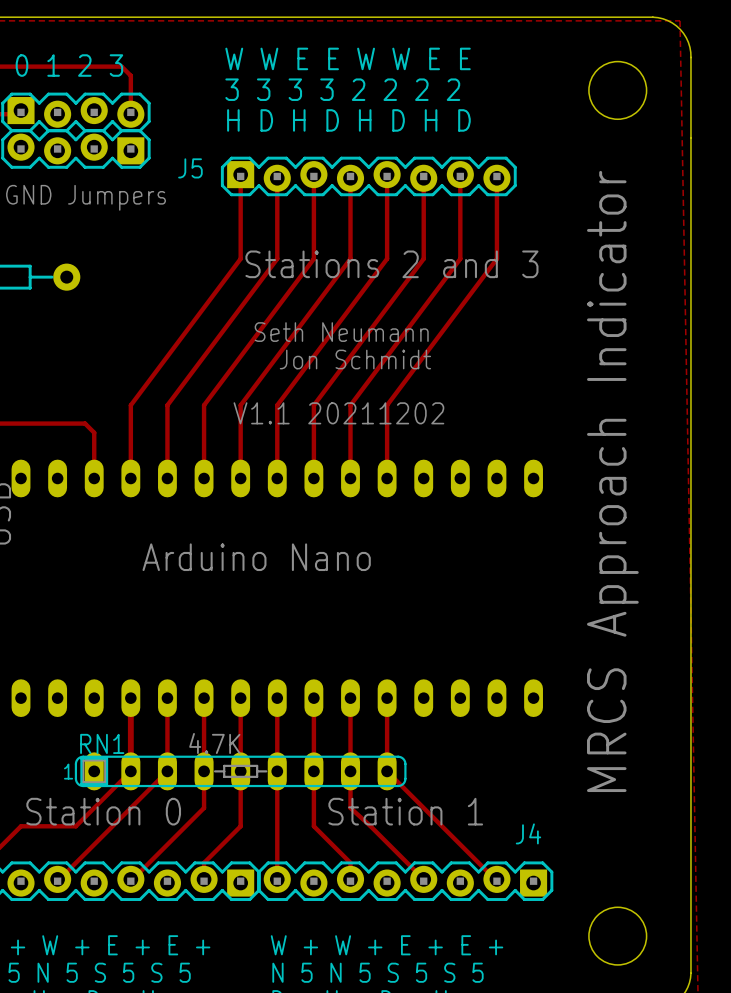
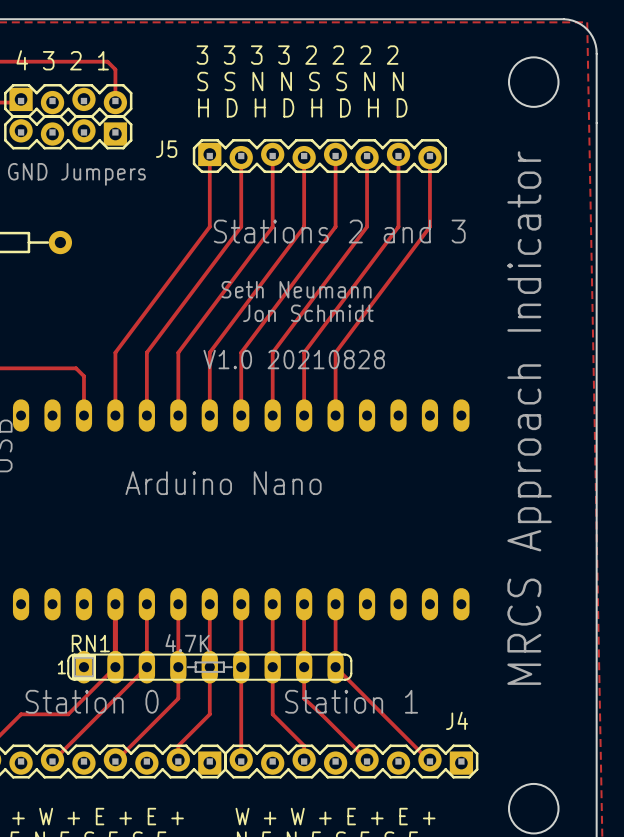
text: W W E E W W E E (348, 58) -> 3 3 3 3 2 2 2 2 (297, 55)
text: 0 1 2 3 (69, 65) -> 4 3 2 1 (62, 60)
text: 3 3 3 3 2 2 2 2 (342, 89) -> S S N N S S N N (300, 81)
text: V1.1 20211202 (338, 413) -> V1.0 20210828 (294, 359)

